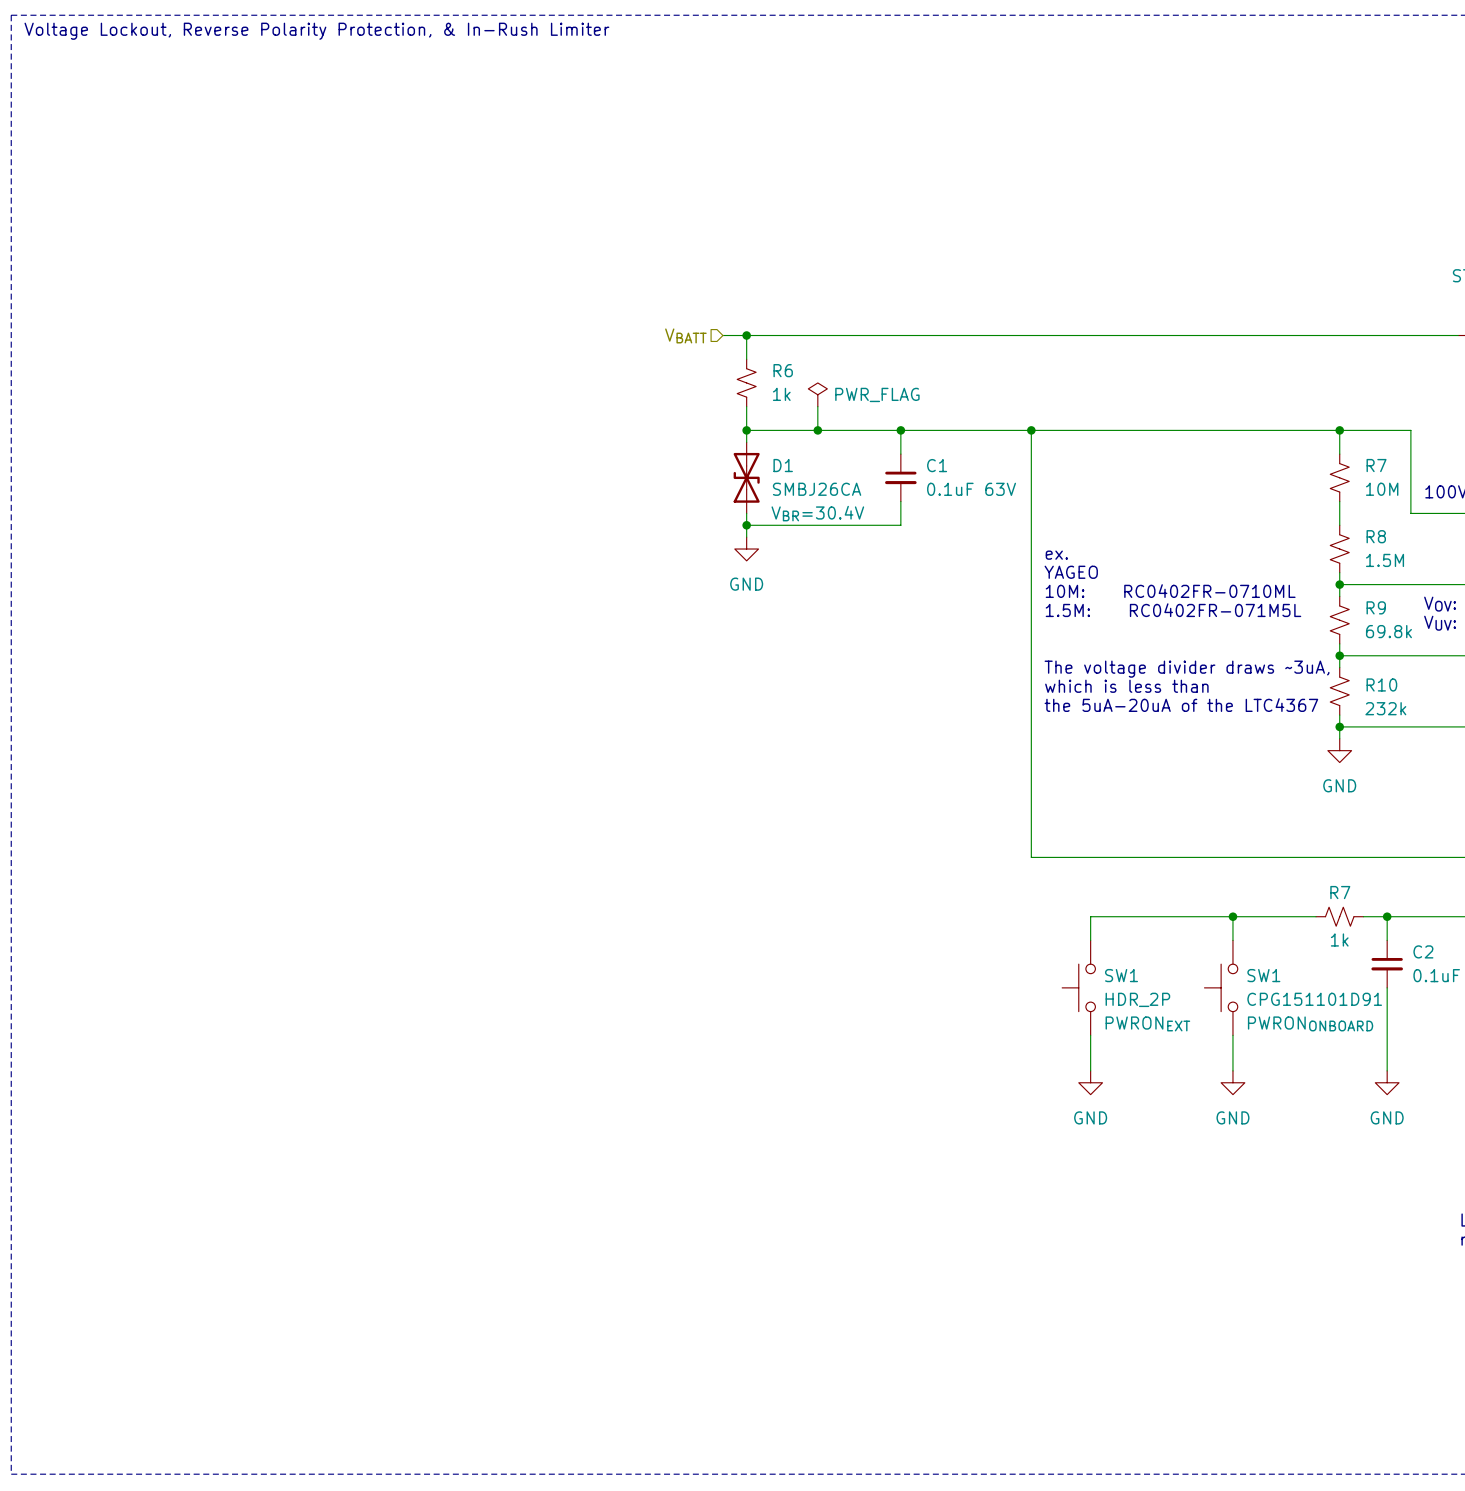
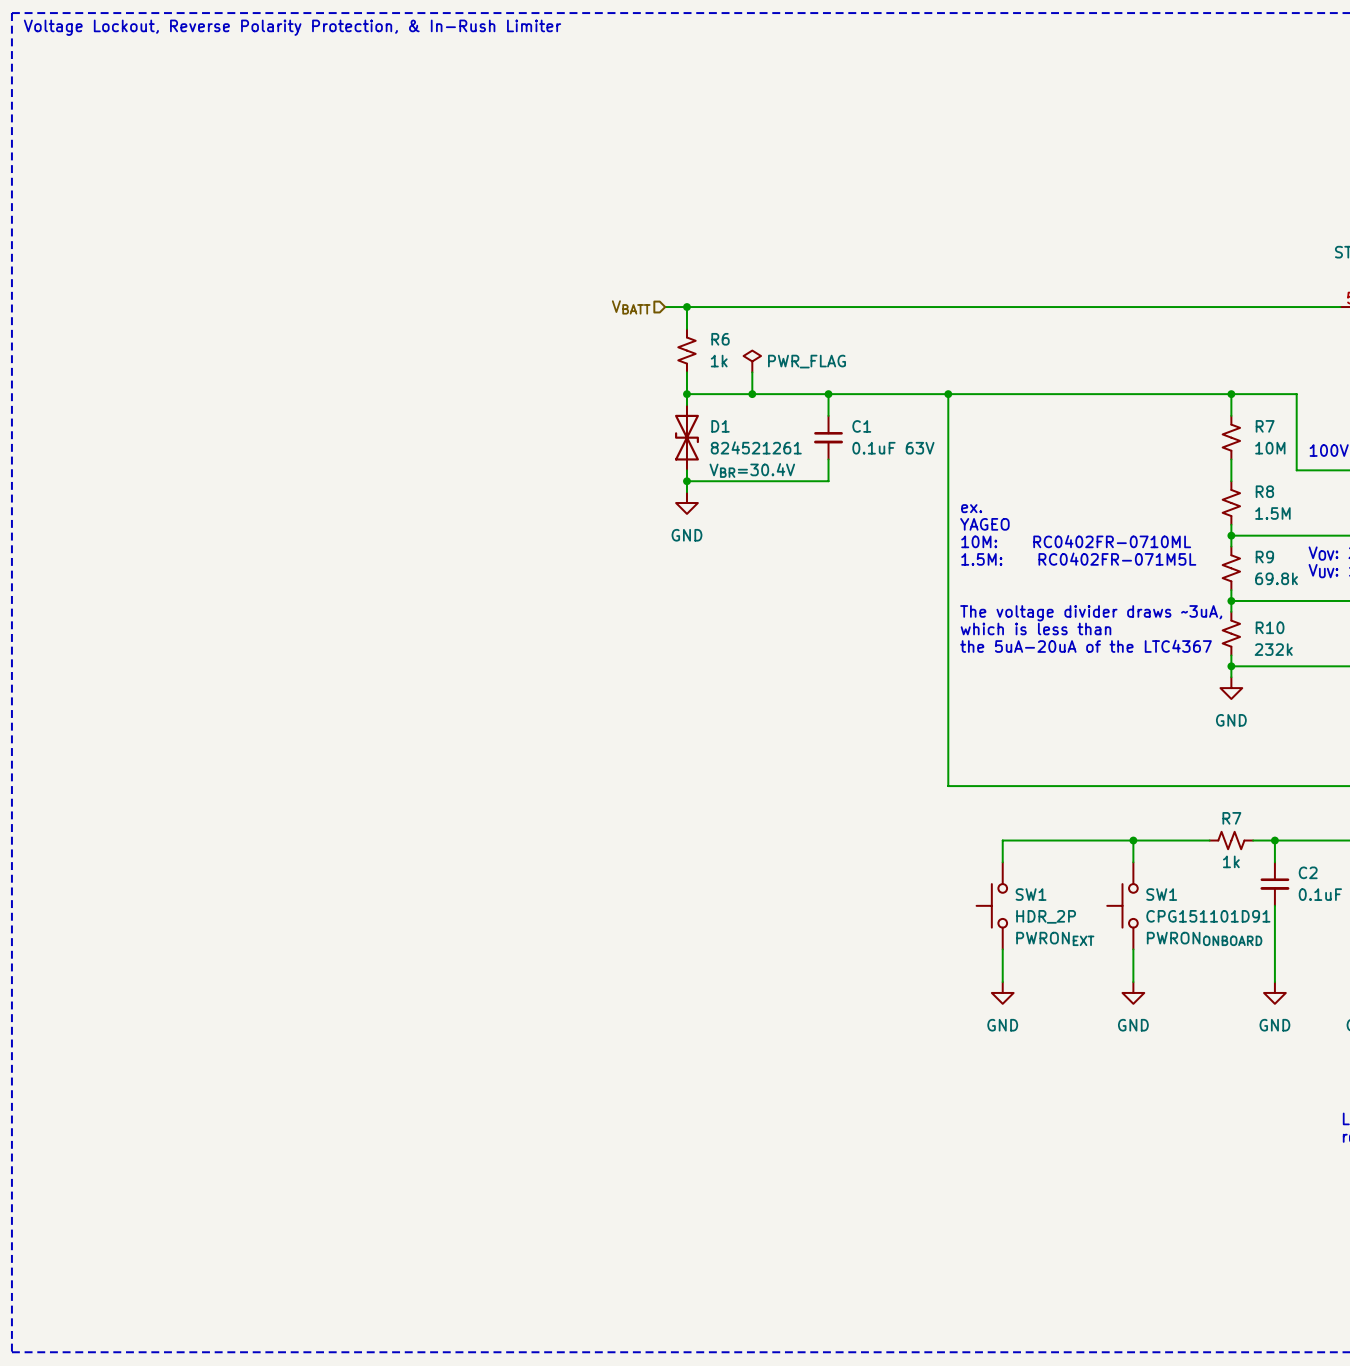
D1 value: SMBJ26CA (817, 489) -> 824521261 (756, 447)

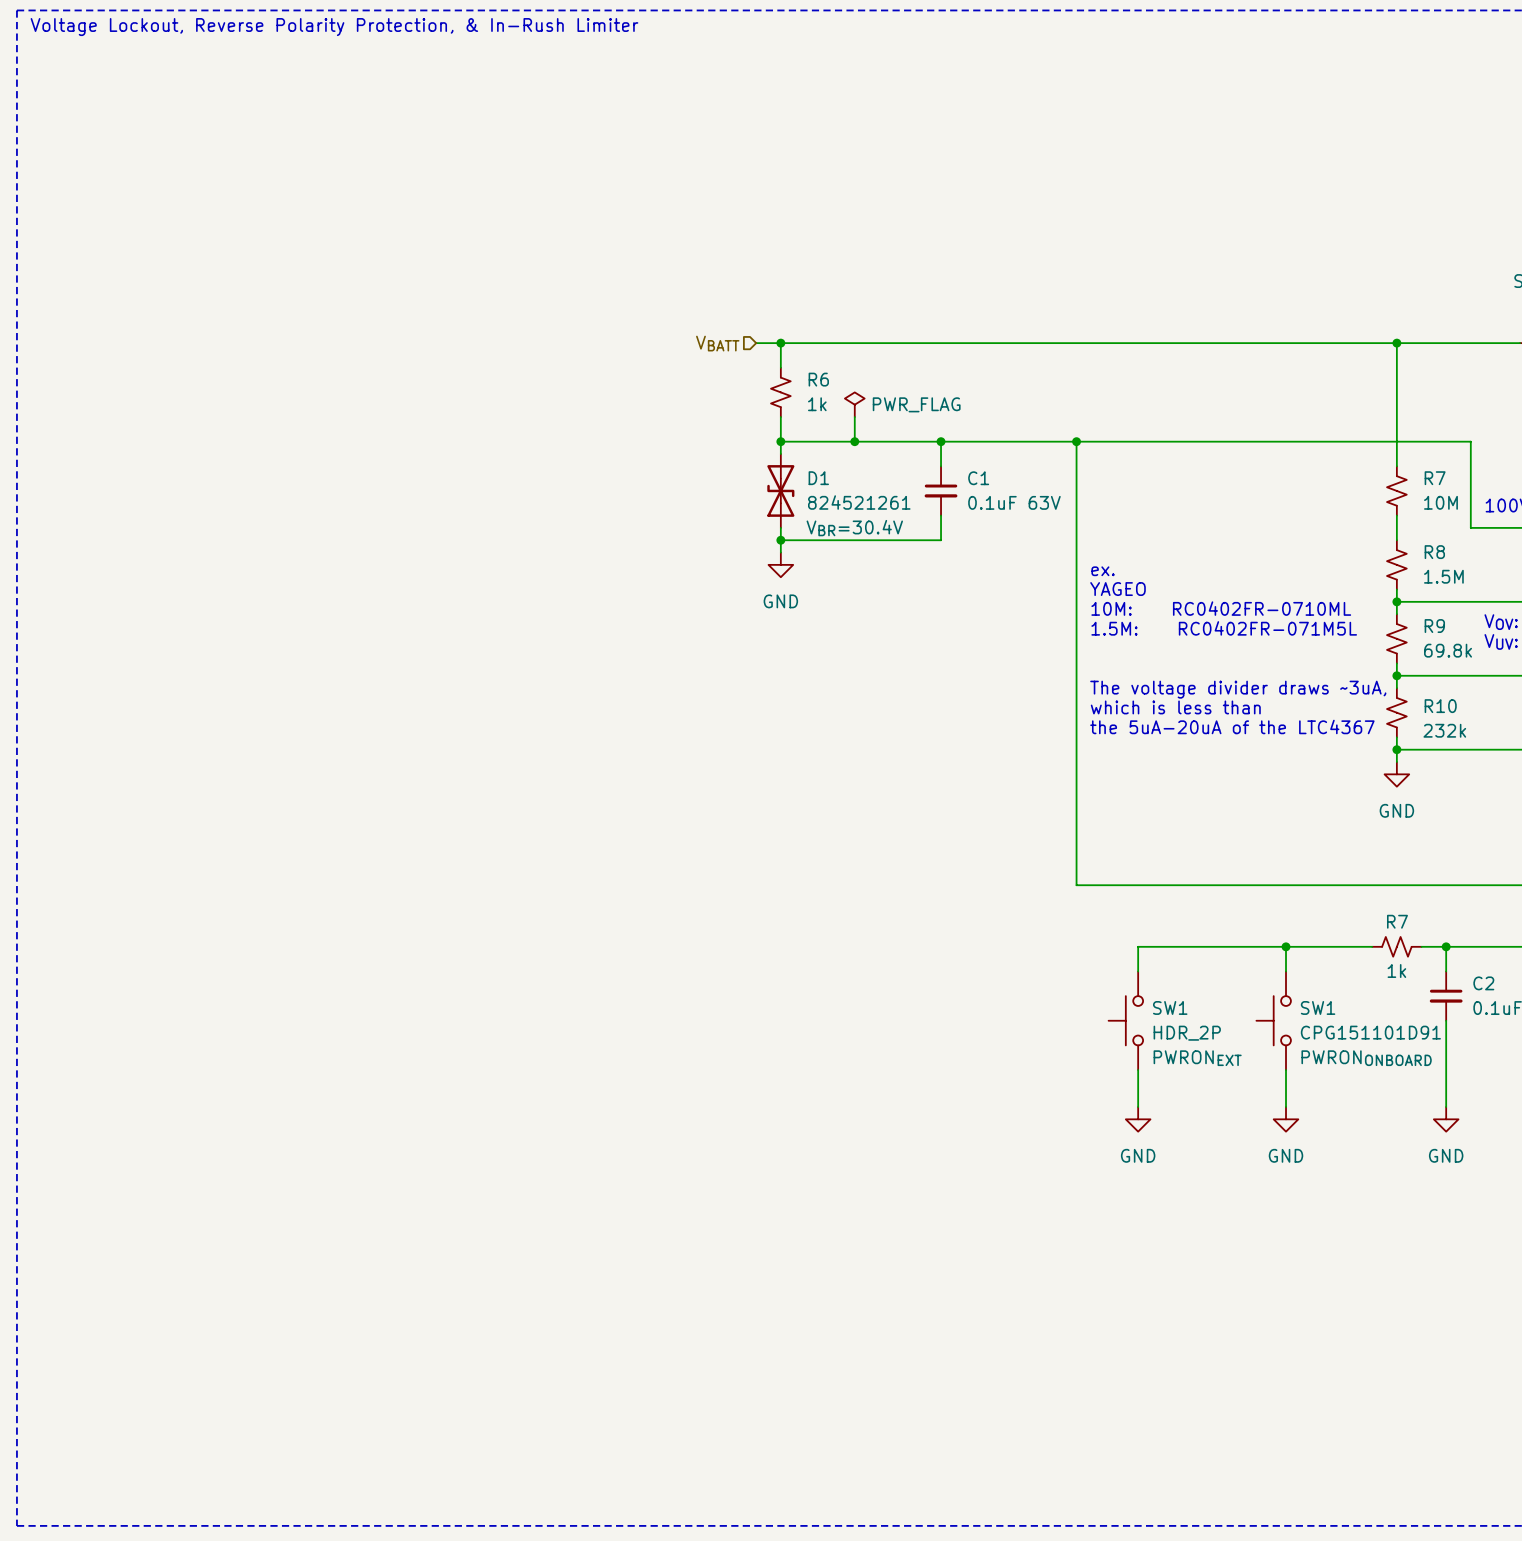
wire: none -> (1396, 343) (1396, 441)
junction: none -> (1396, 343)
junction: (1231, 394) -> none

